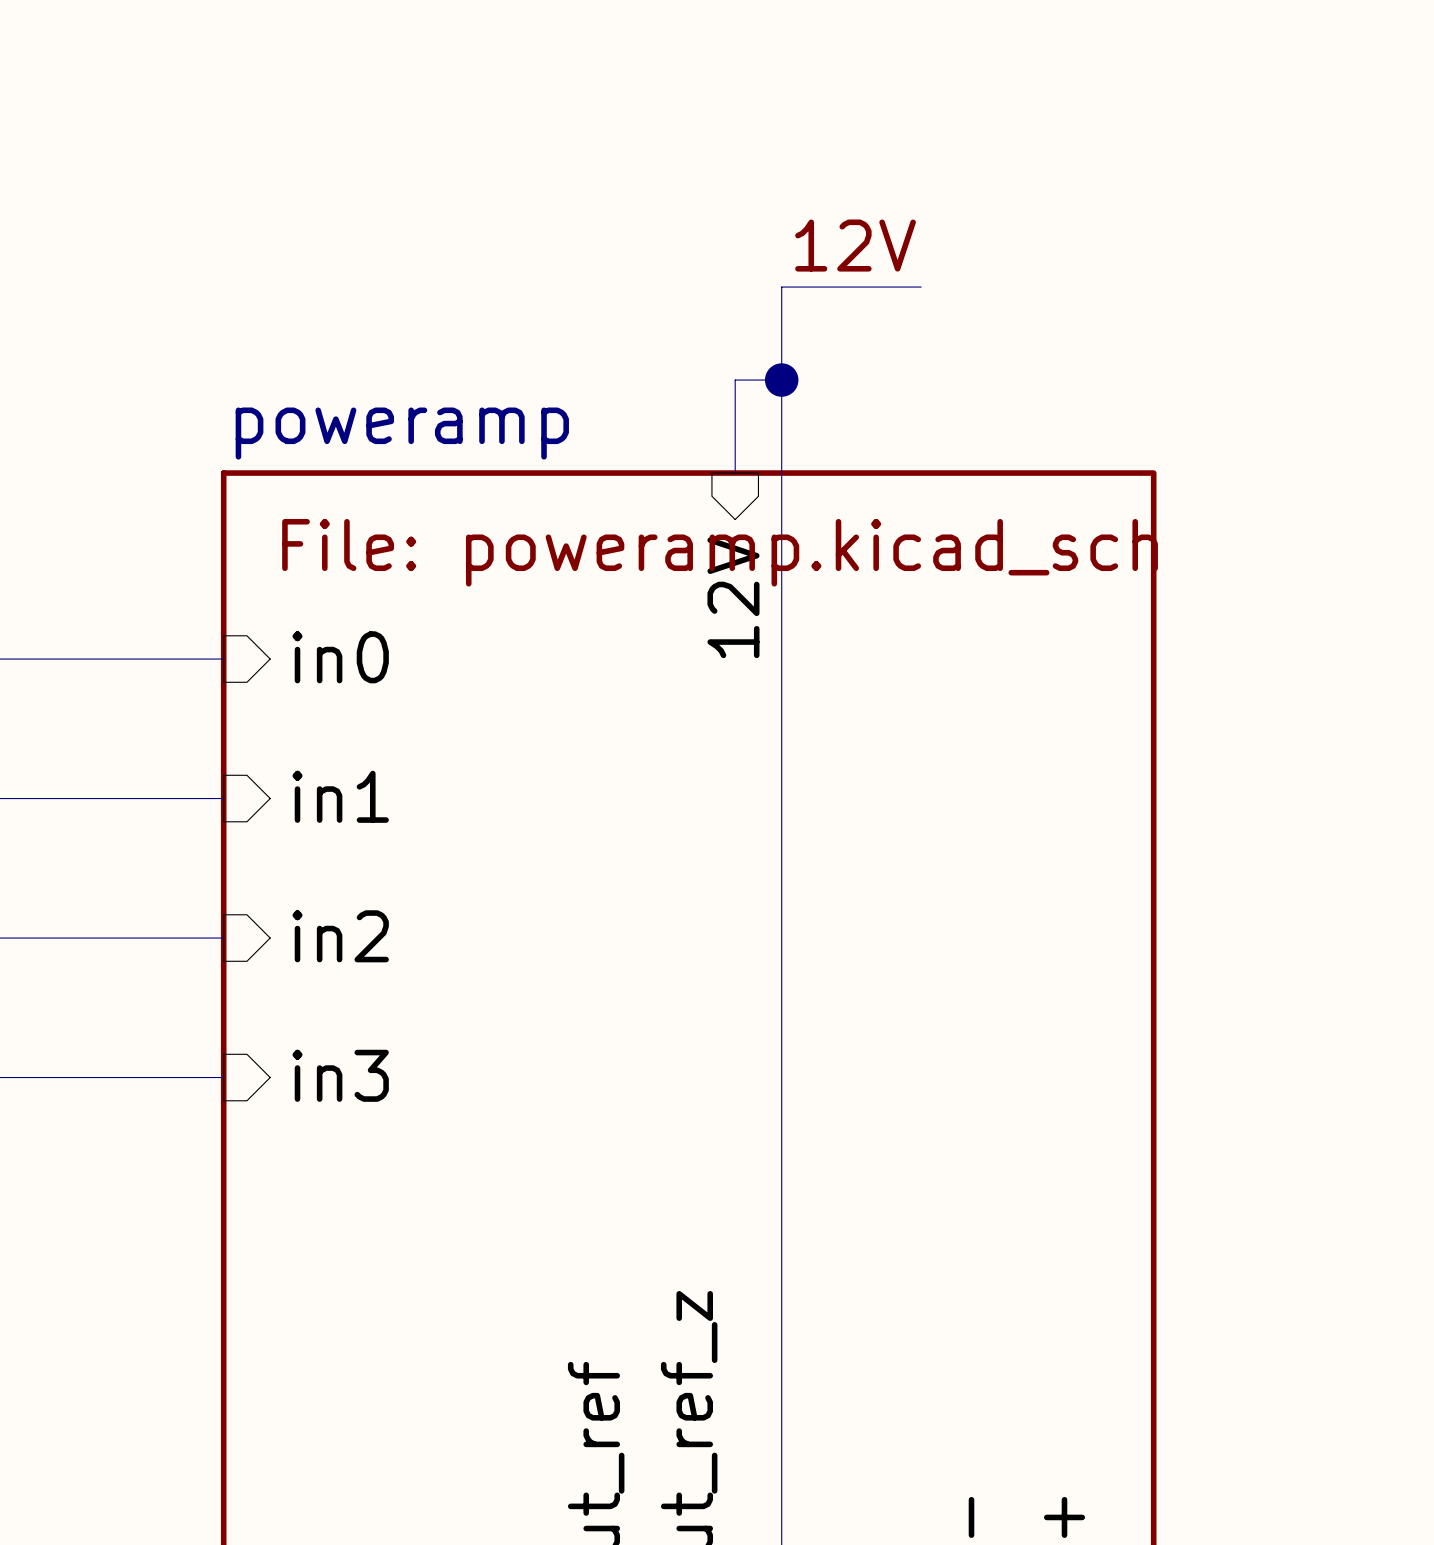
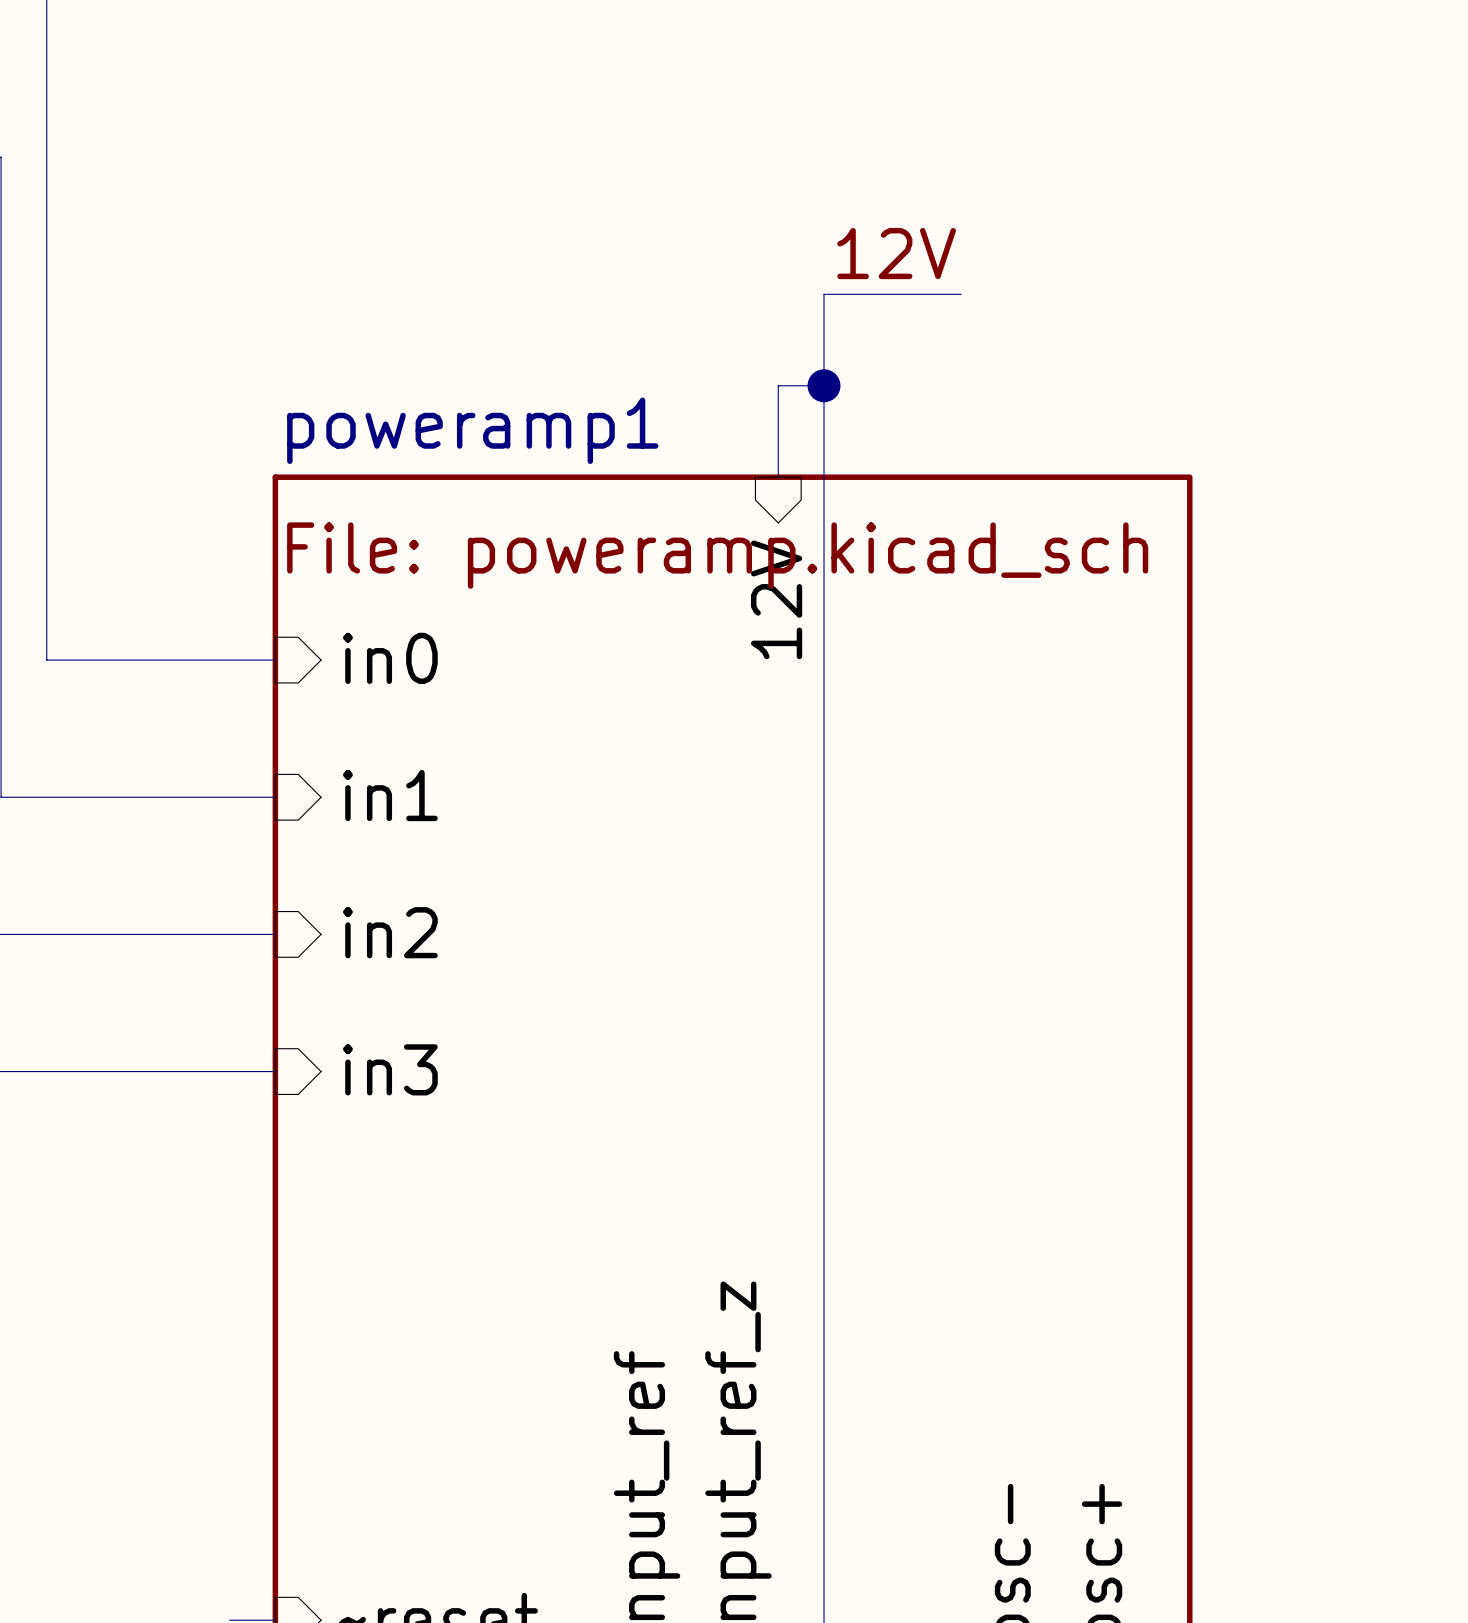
sheet poweramp name: poweramp (402, 433) -> poweramp1 (472, 430)
sheet poweramp value position: File: poweramp.kicad_sch (720, 552) -> File: poweramp.kicad_sch (717, 555)

